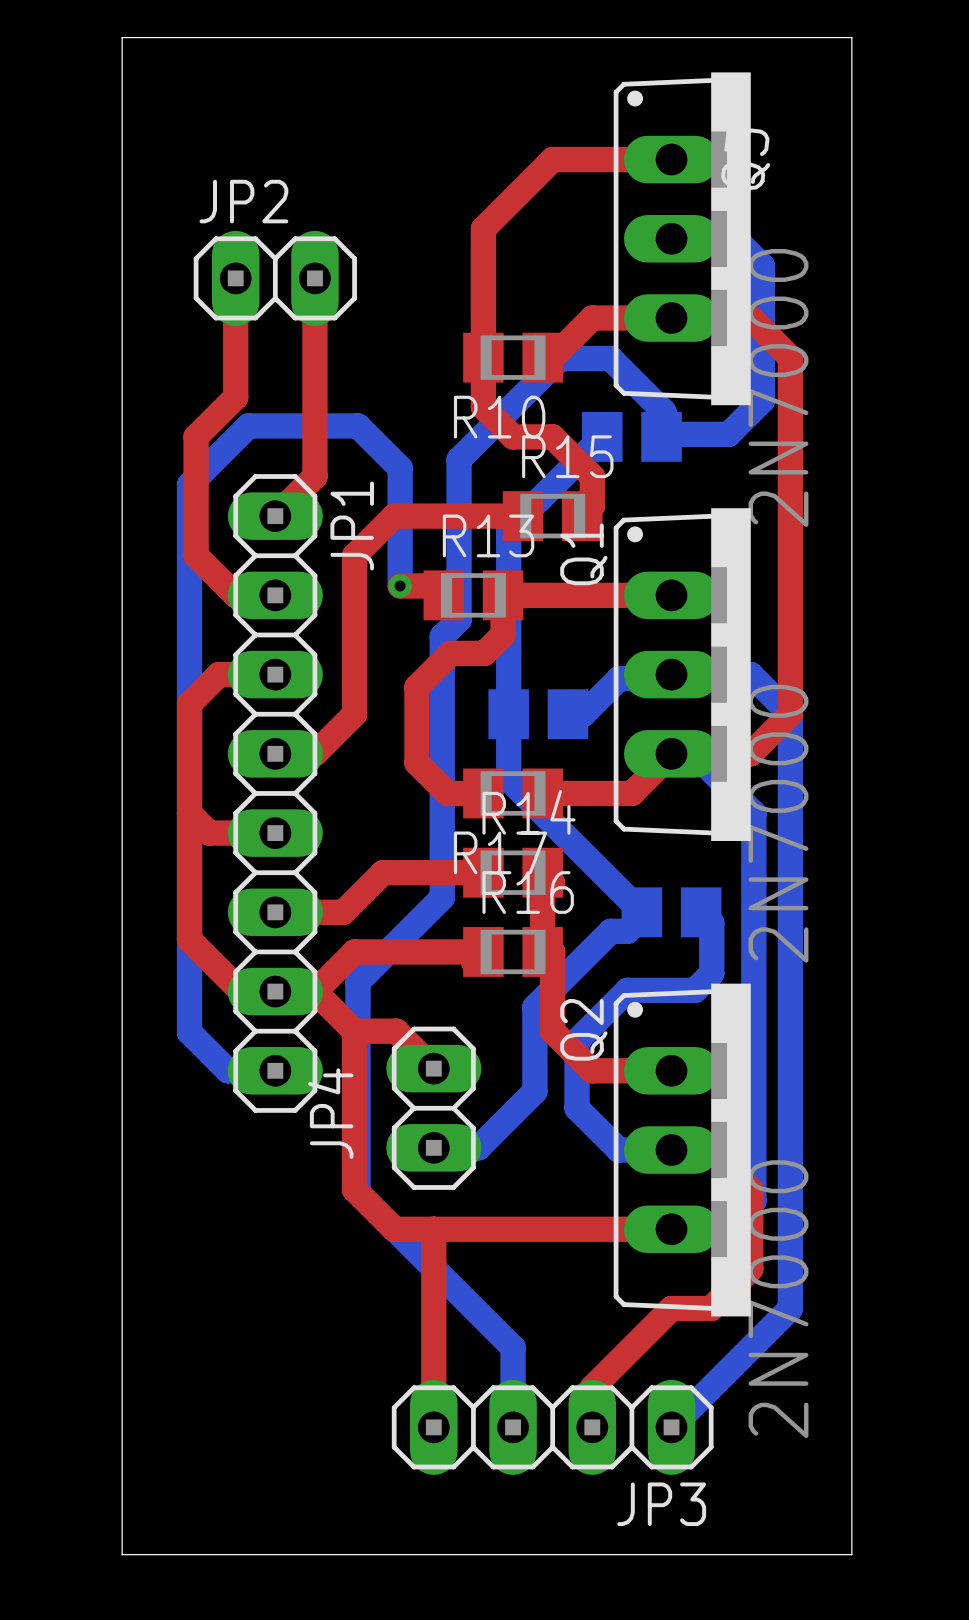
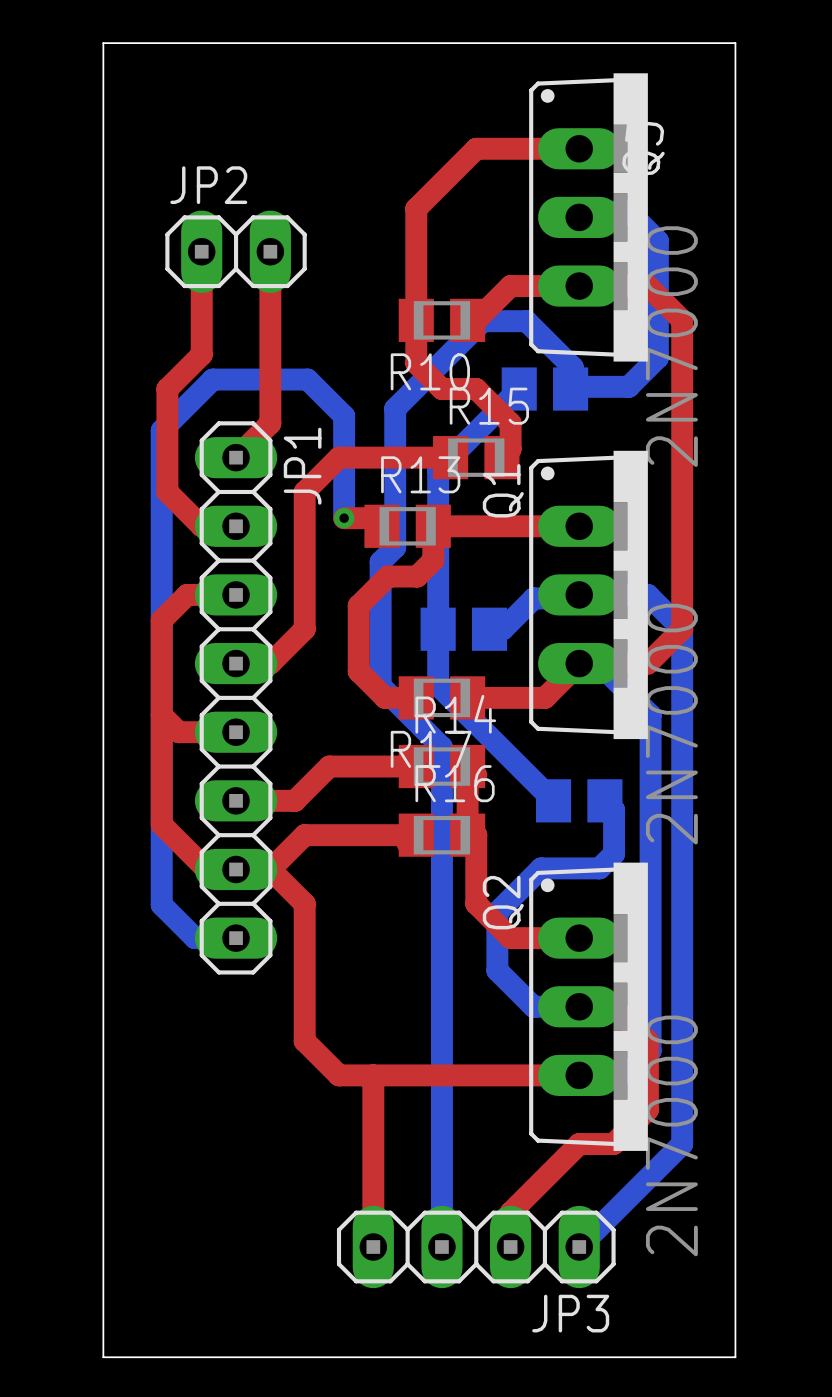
bottom track: (442, 779) (442, 897) (358, 981) (358, 1192) (513, 1347) -> (380, 686) (441, 747) (441, 1177)
bottom track: (641, 912) (641, 917) (627, 931) (610, 931) (534, 1007) (534, 1091) (478, 1147) (433, 1147) -> none
top track: (354, 1031) (396, 1031) (433, 1068) -> none
JP4: (433, 1108) -> none

